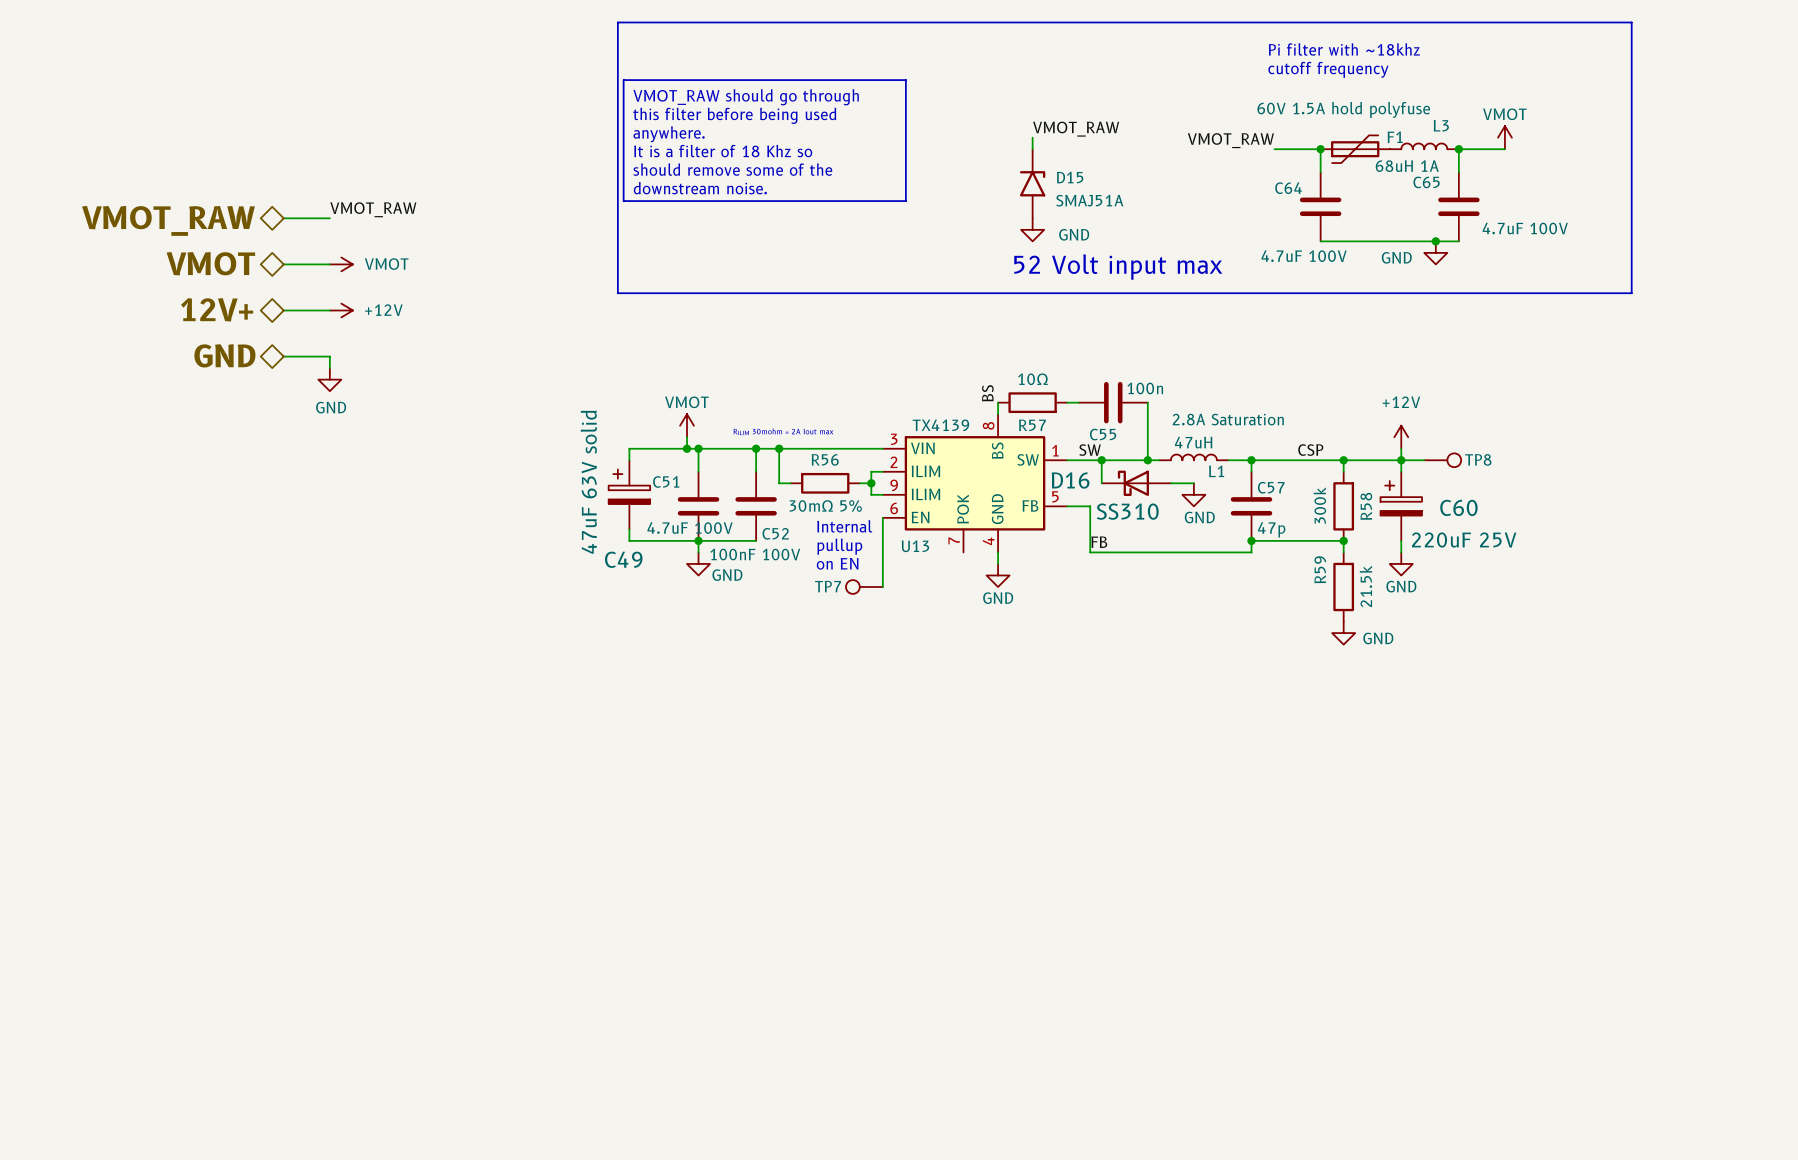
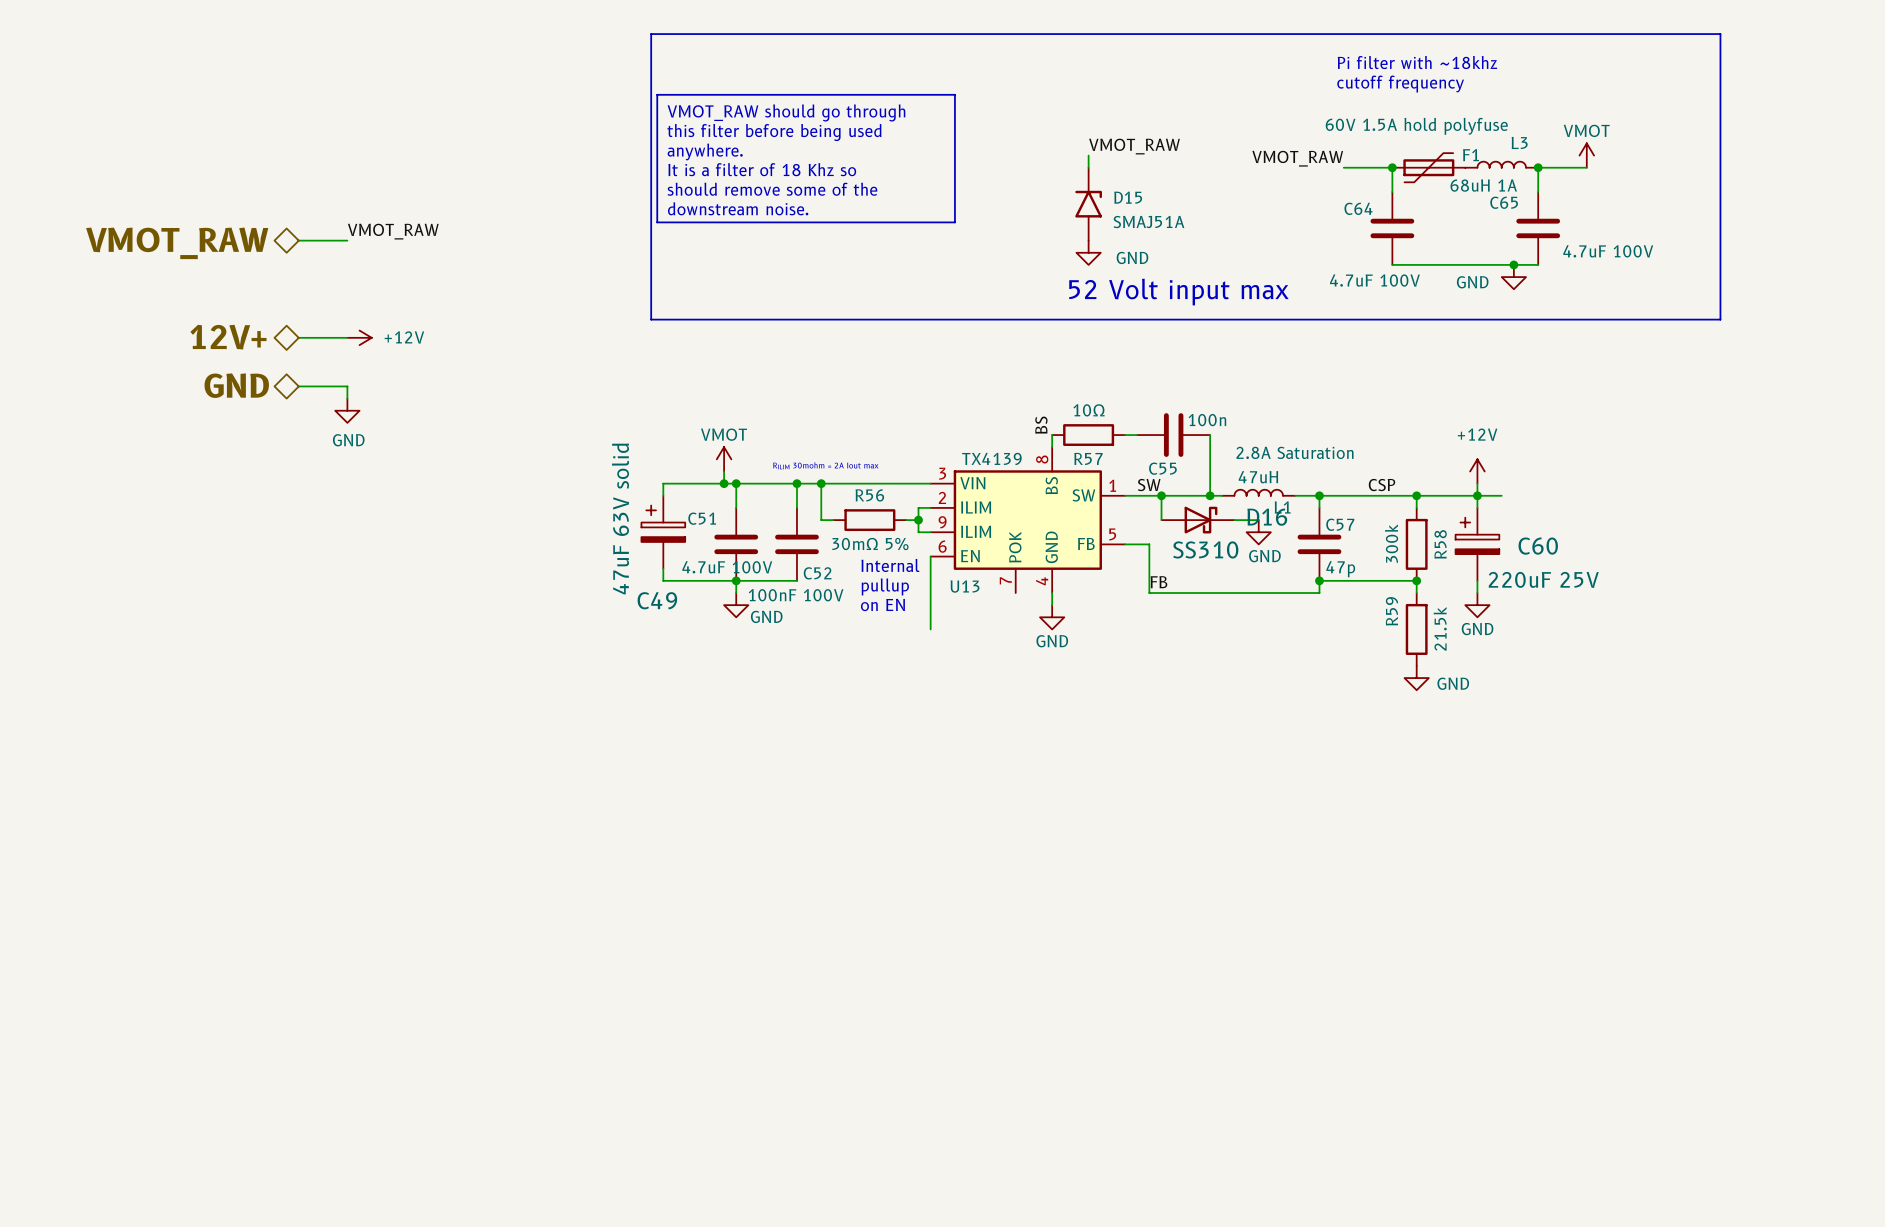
hierarchical label: VMOT (210, 263) -> none
wire: (283, 264) (329, 264) -> none
power symbol: VMOT (341, 264) -> none
TP8: (1442, 460) -> none
D16 flip: as is (1133, 483) -> left-right (1201, 520)
TP7: (864, 586) -> none

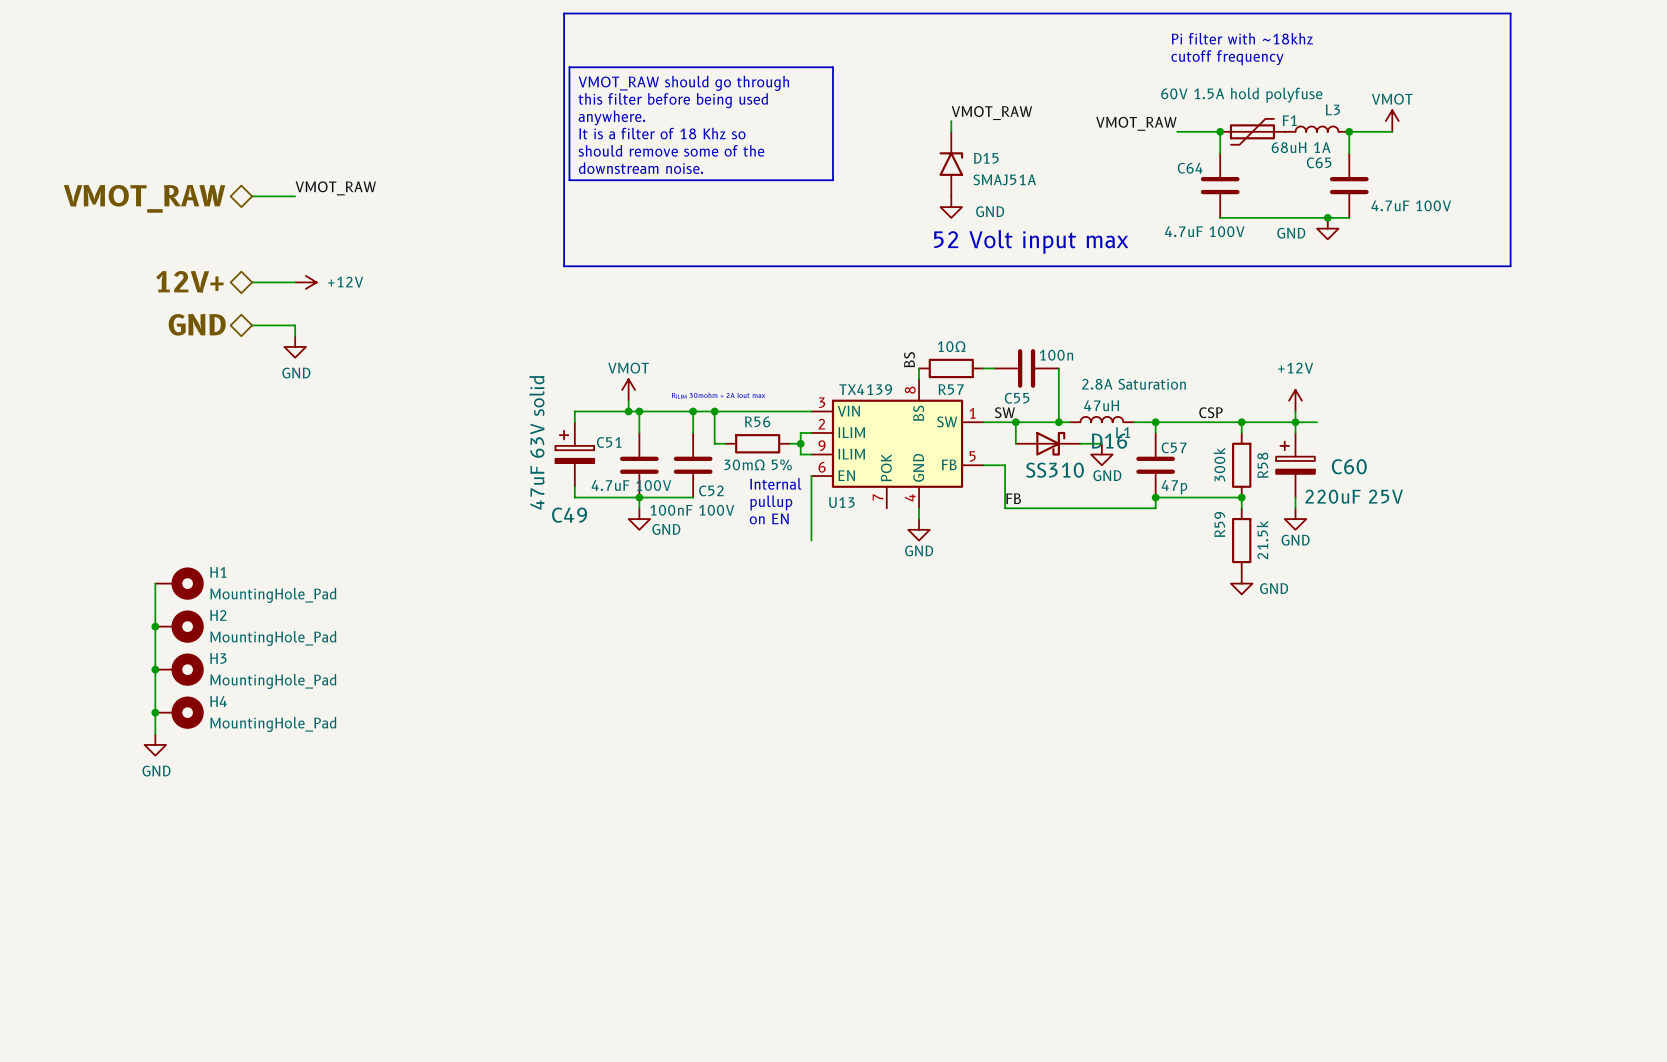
wire: none -> (155, 583) (155, 734)
H1: none -> MountingHole_Pad (179, 583)
junction: none -> (155, 626)
H2: none -> MountingHole_Pad (179, 626)
junction: none -> (155, 669)
H3: none -> MountingHole_Pad (179, 669)
junction: none -> (155, 712)
H4: none -> MountingHole_Pad (179, 712)
power symbol: none -> GND (155, 744)

